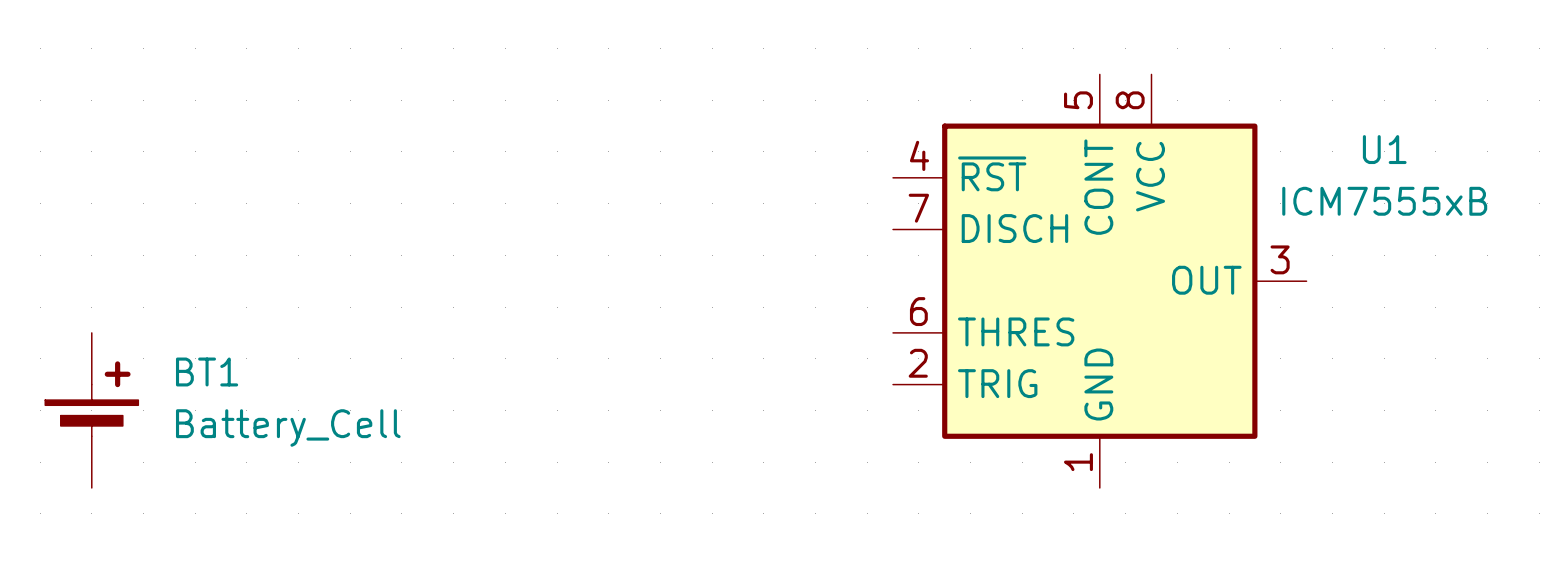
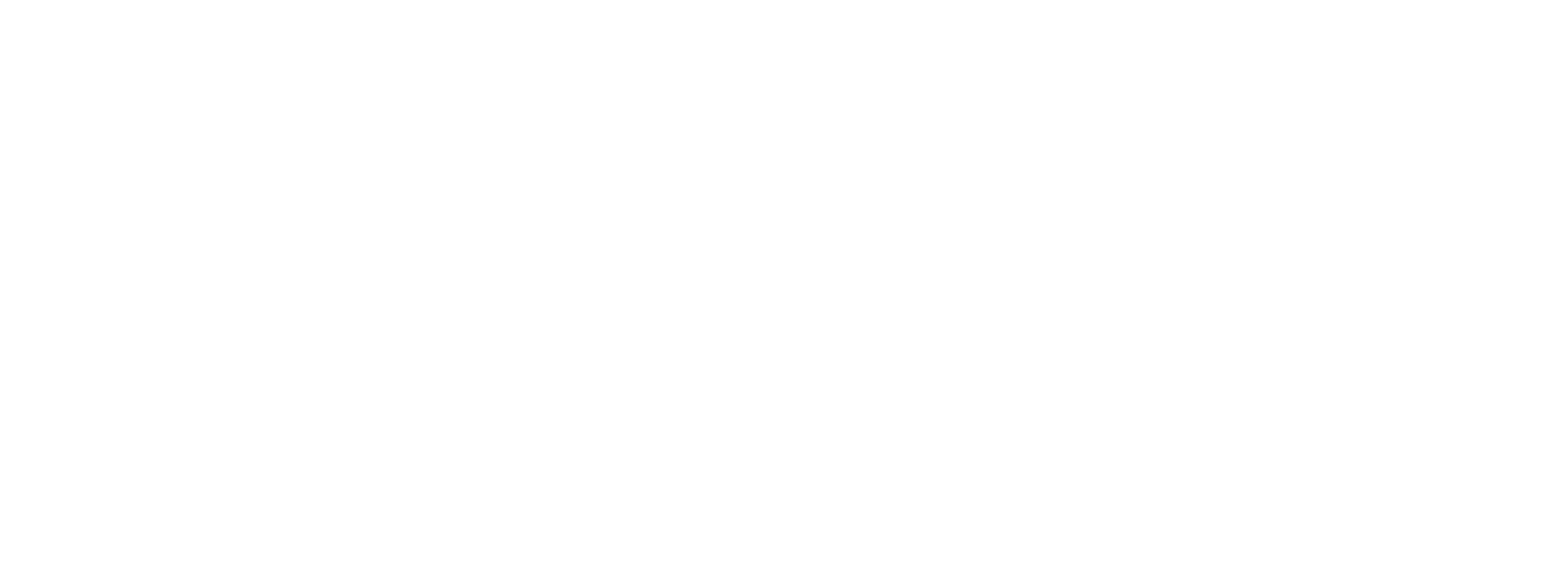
U1: ICM7555xB (1099, 281) -> none
BT1: Battery_Cell (91, 410) -> none

